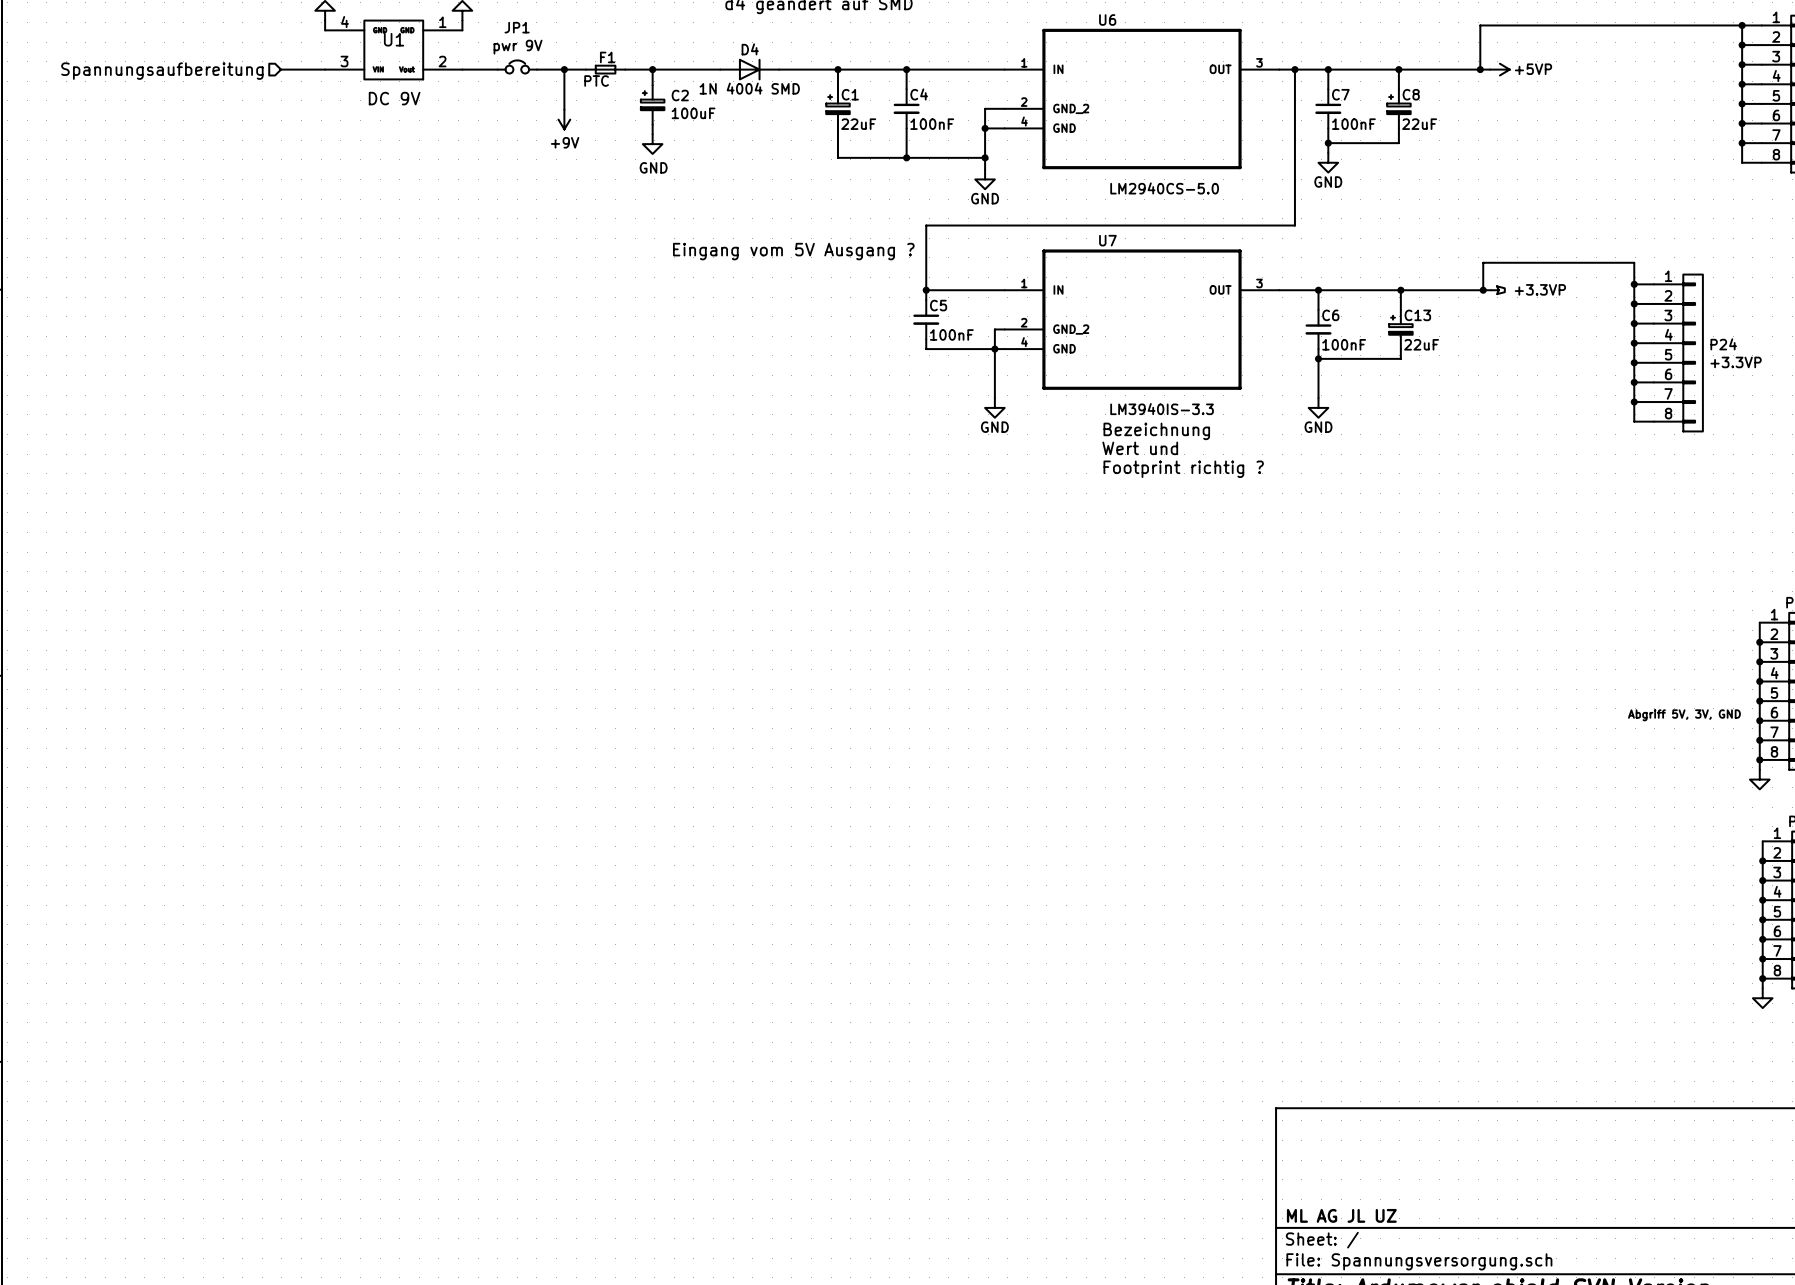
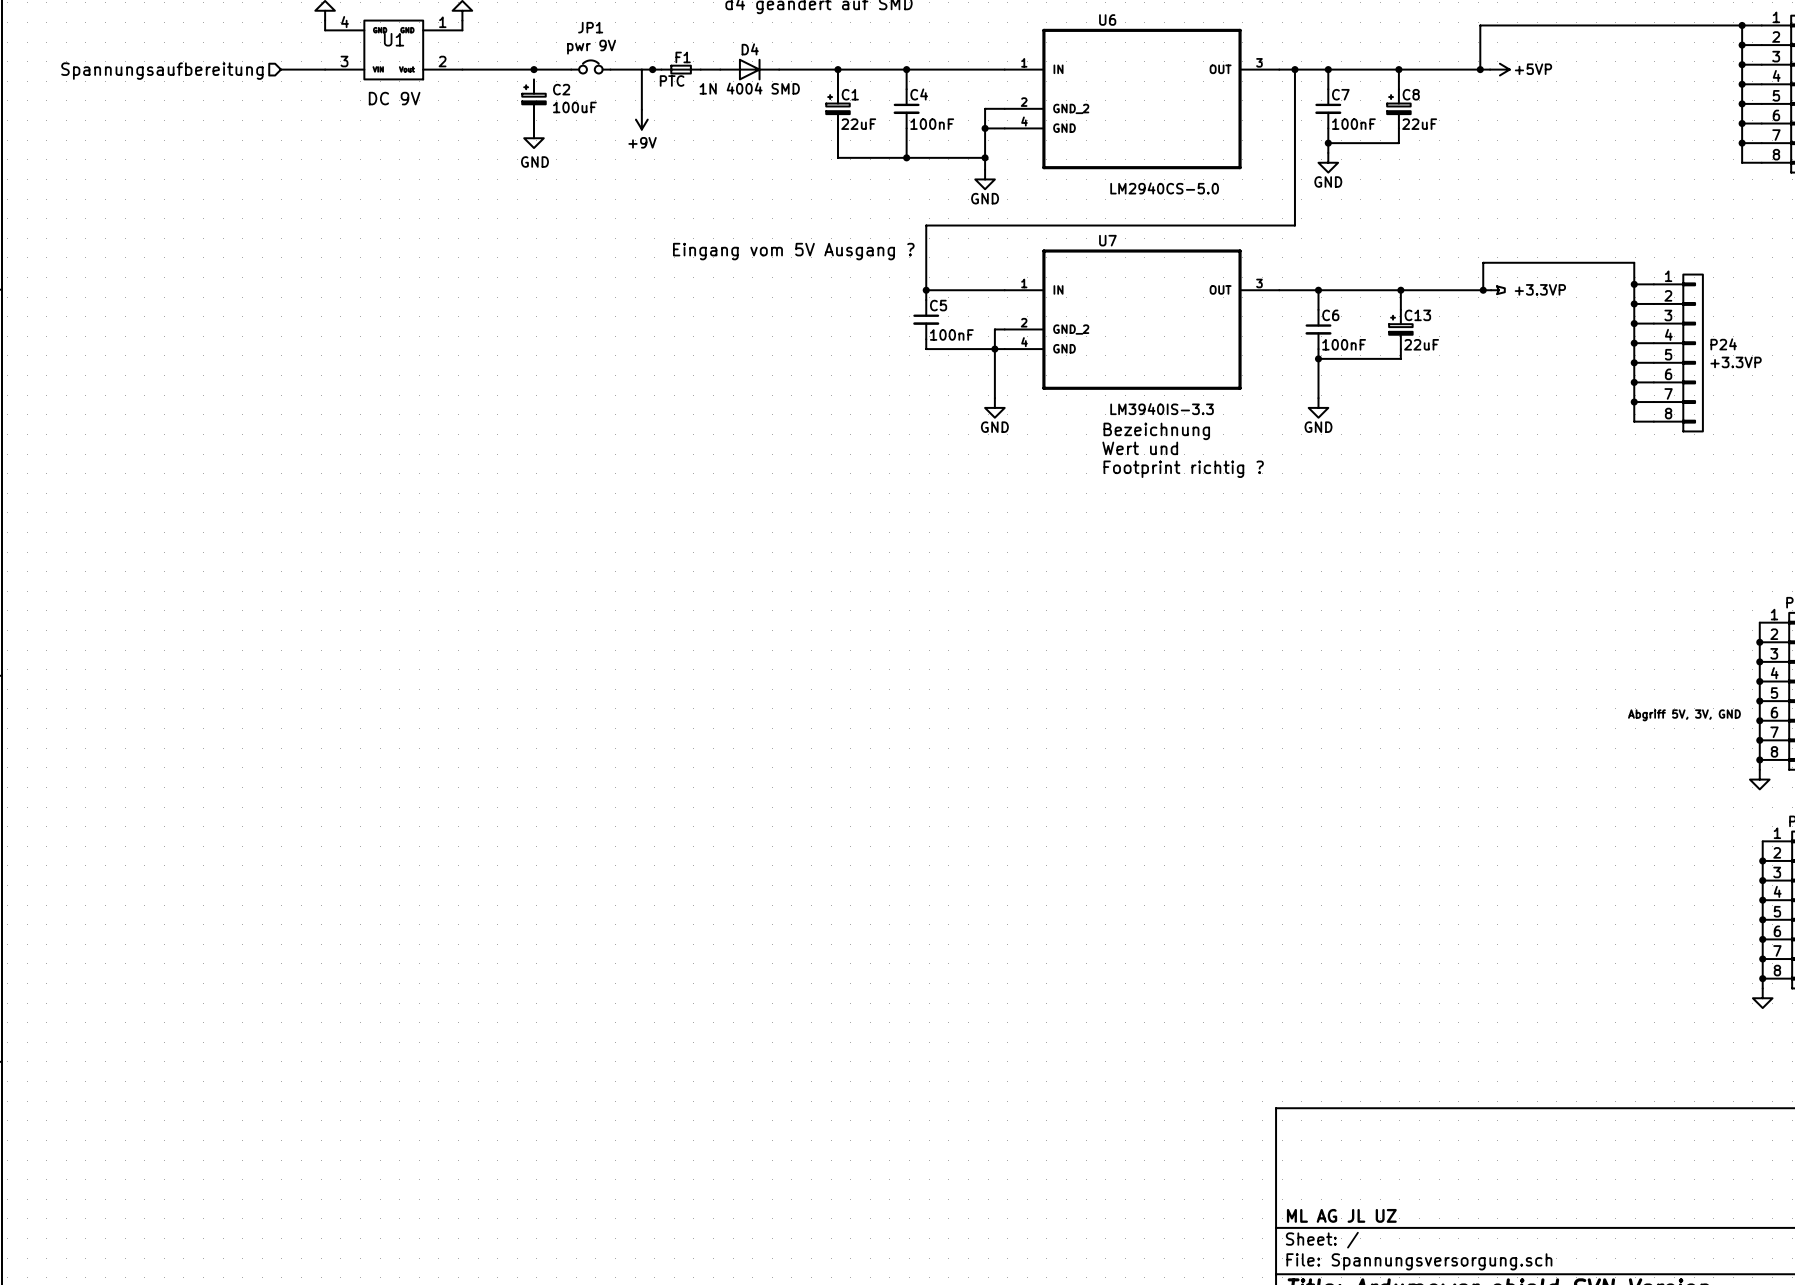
JP1 position: (517, 66) -> (590, 66)
wire: (564, 69) (564, 109) -> (641, 69) (641, 109)
junction position: (564, 69) -> (533, 69)
F1 position: (605, 69) -> (681, 69)
wire: (652, 69) (652, 85) -> none
C2 position: (652, 104) -> (533, 99)
power symbol position: +9V (564, 119) -> +9V (641, 119)
wire: (652, 124) (652, 134) -> (533, 118) (533, 128)
power symbol position: GND (652, 144) -> GND (533, 138)

